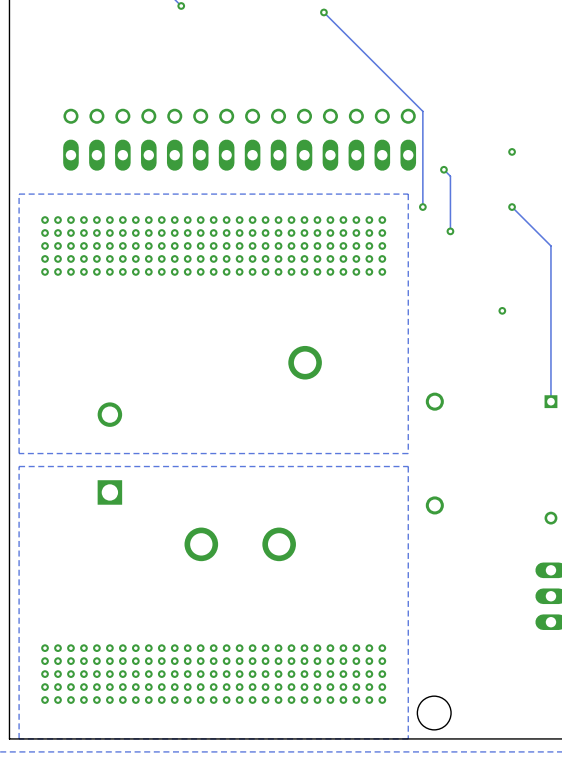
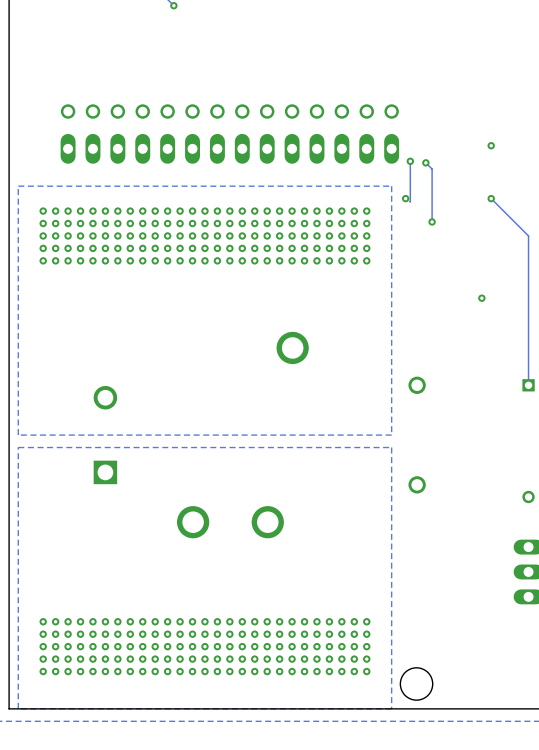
track: (323, 12) (422, 111) (422, 207) -> none
via: (323, 12) -> none
track: none -> (410, 161) (409, 201)
via: none -> (410, 161)

